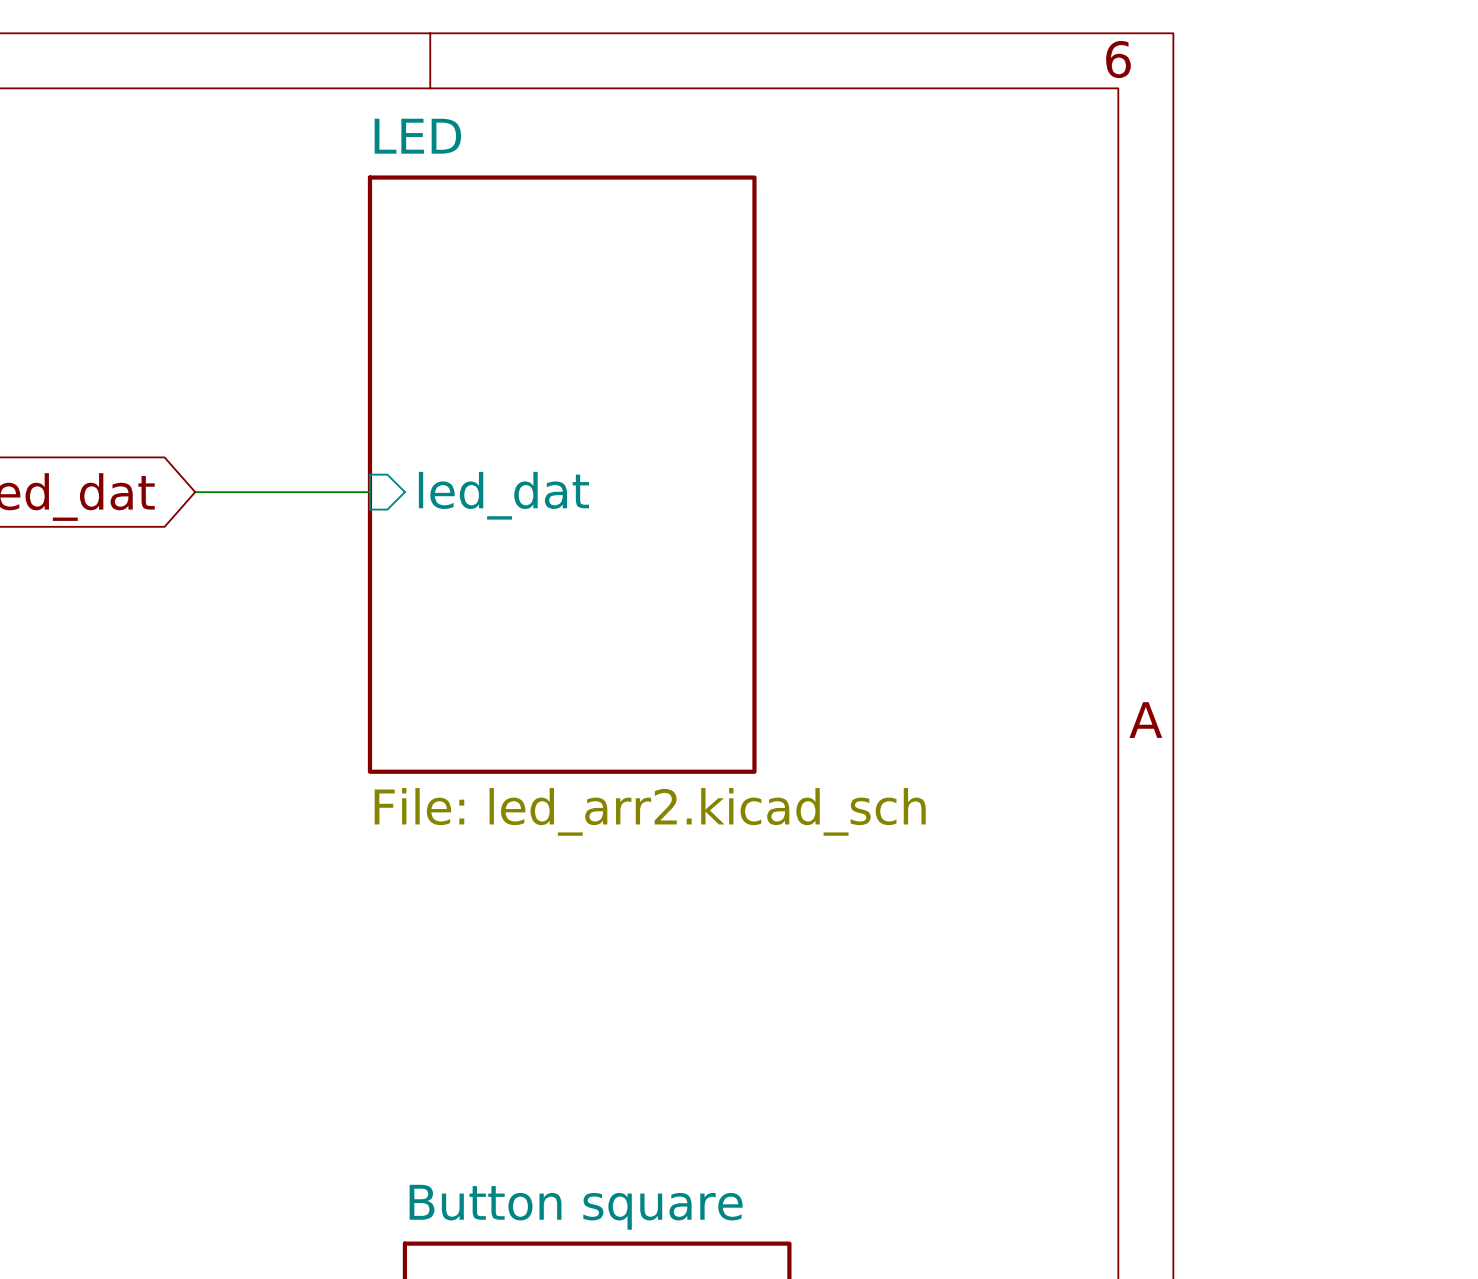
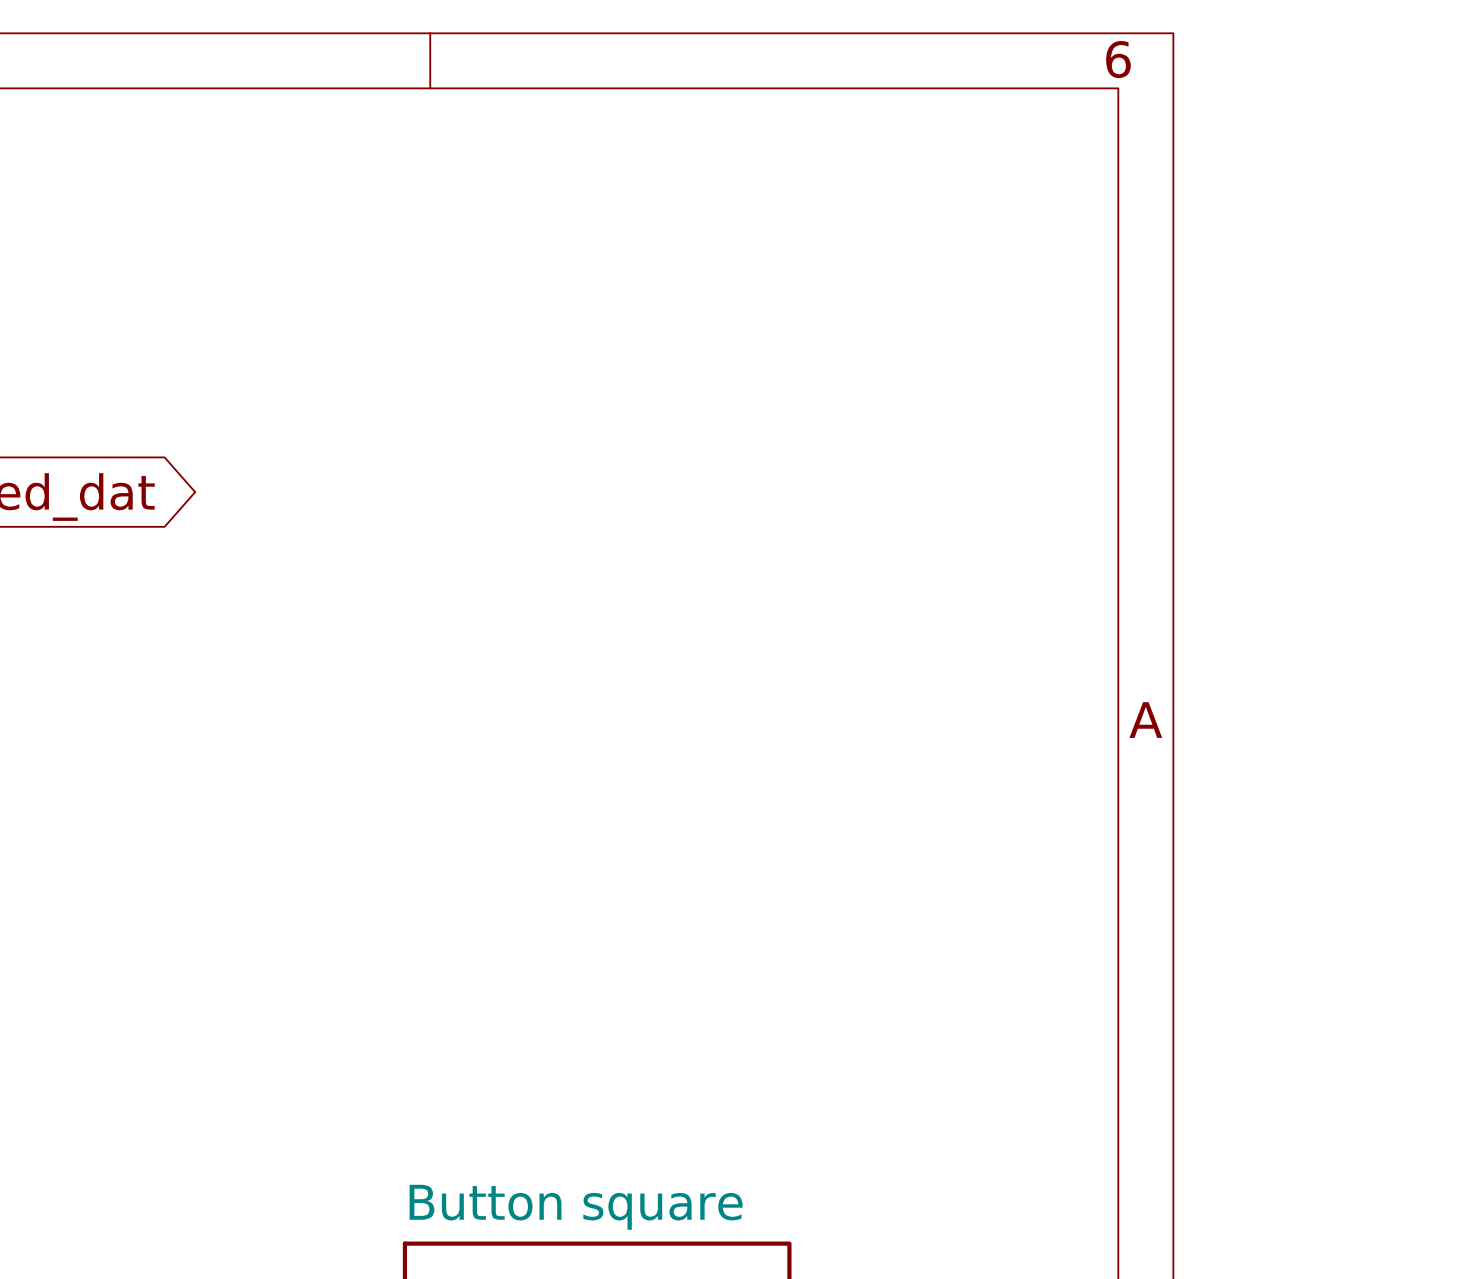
sheet LED: File: led_arr2.kicad_sch (562, 474) -> none
wire: (195, 492) (369, 492) -> none
sheet pin: led_dat (503, 495) -> none

